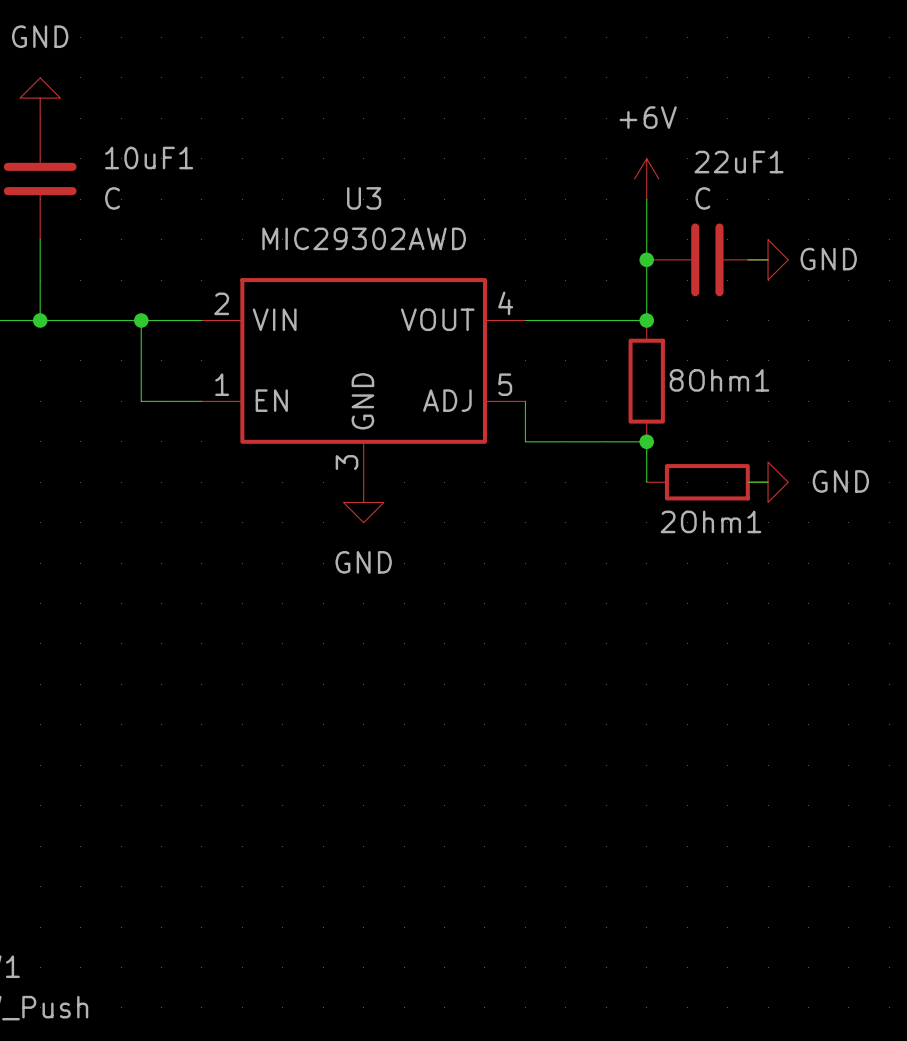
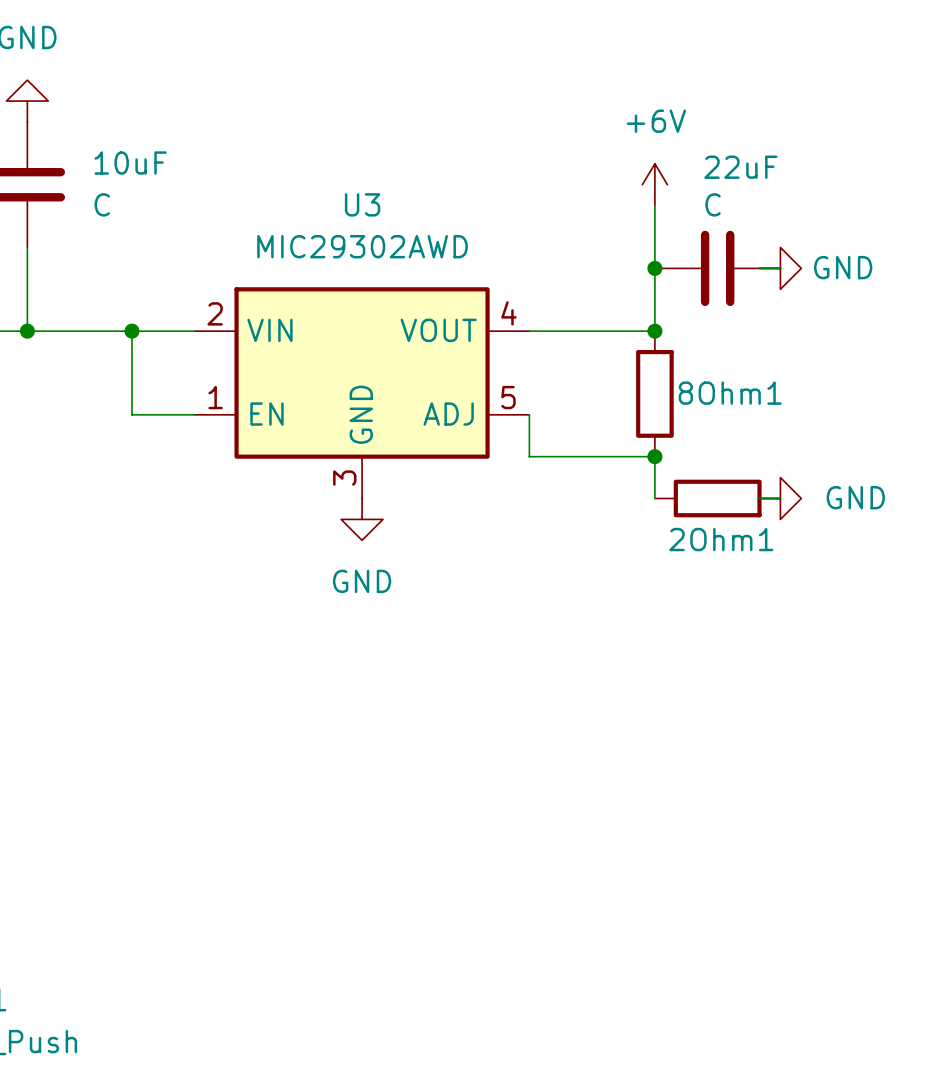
10uF1 name: 10uF1 (149, 158) -> 10uF (130, 163)
22uF1 name: 22uF1 (739, 162) -> 22uF (740, 167)

